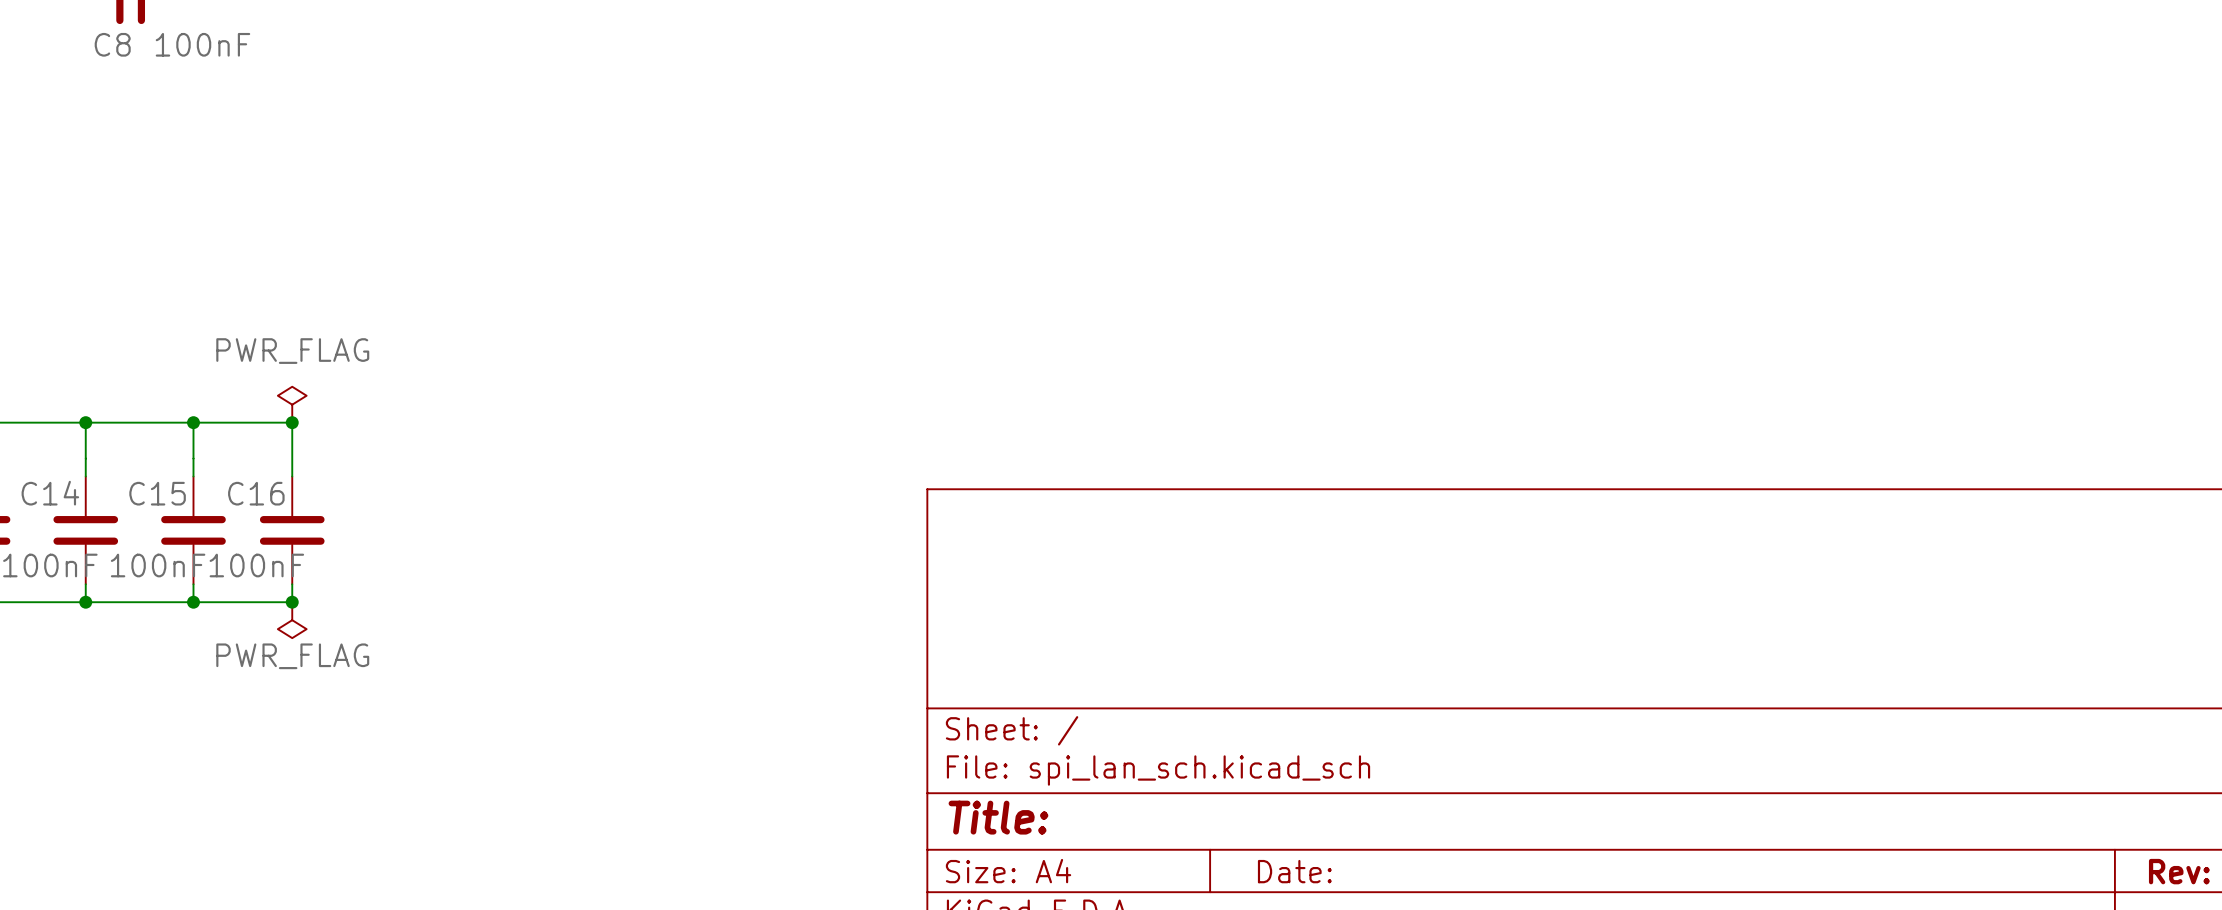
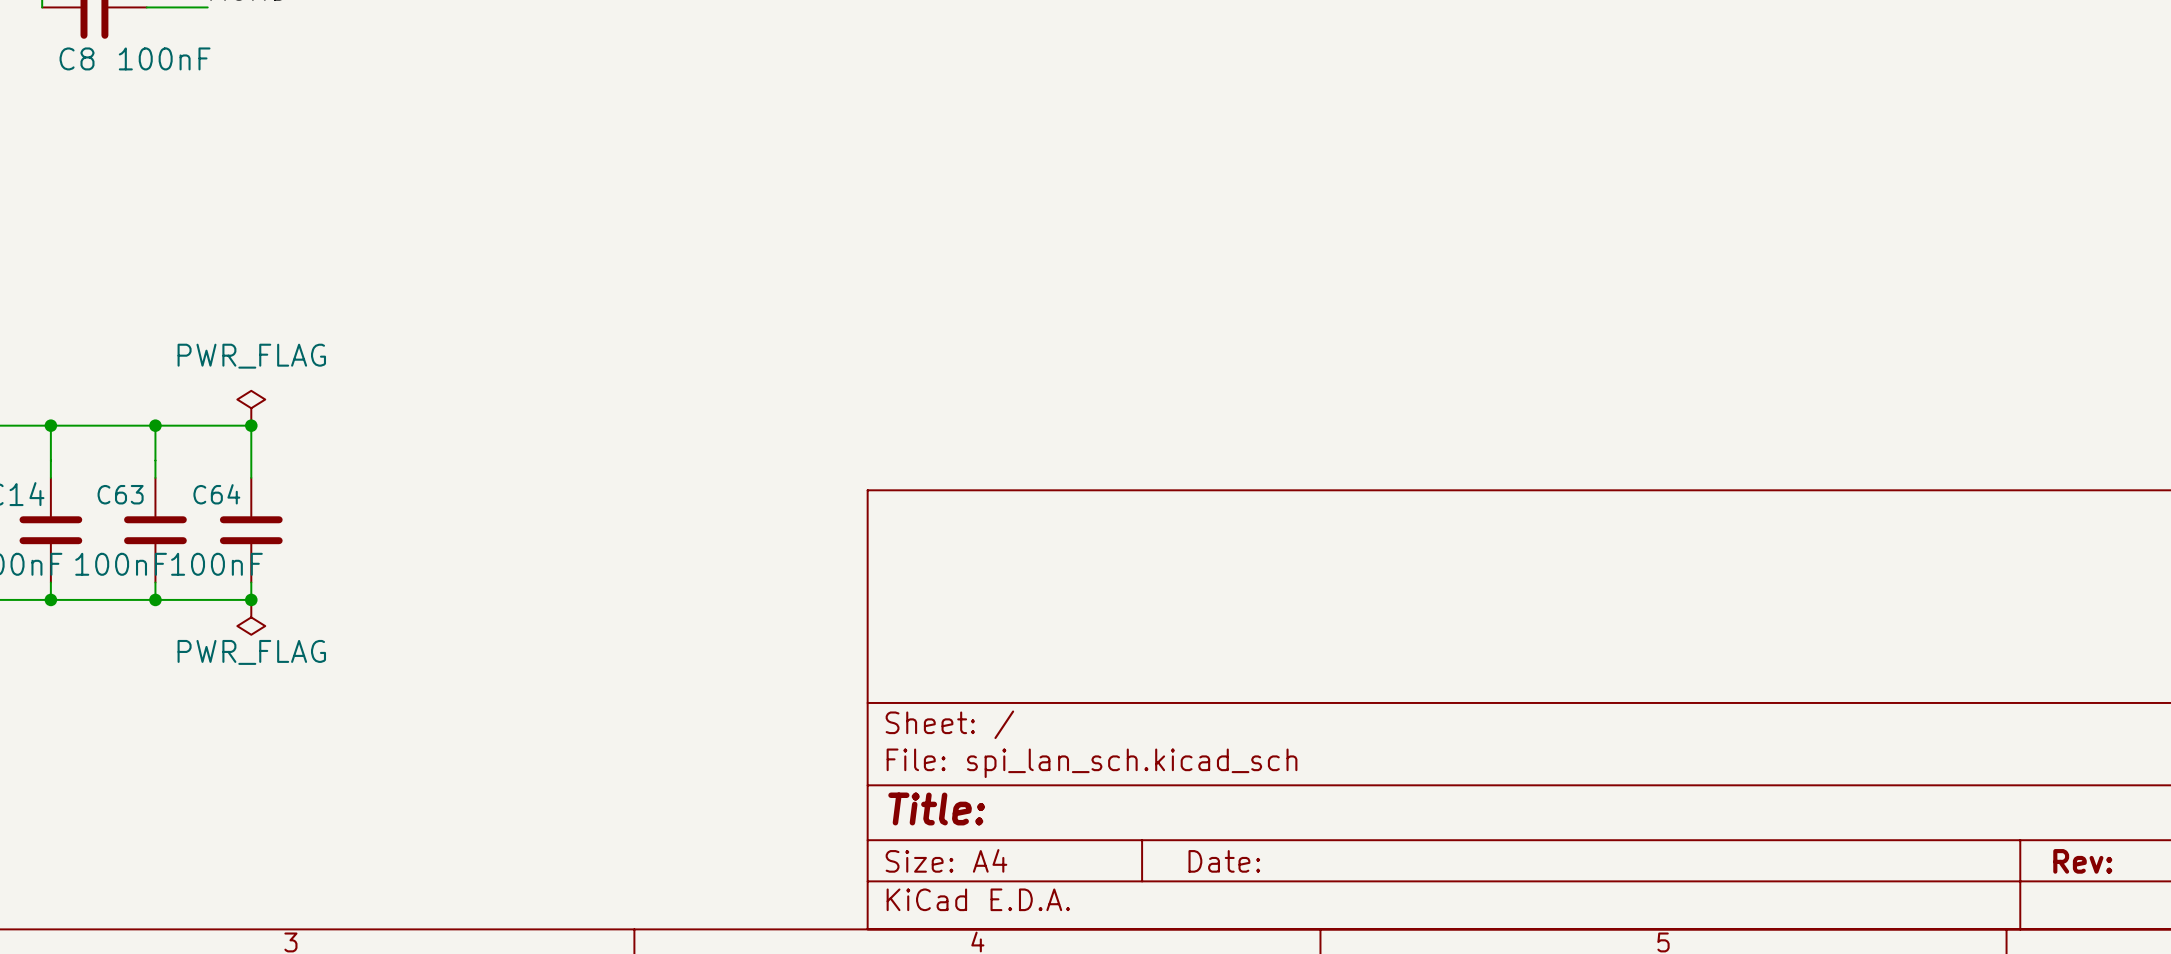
C15 name: C15 (157, 493) -> C63 (120, 494)
C16 name: C16 (256, 493) -> C64 (216, 494)

